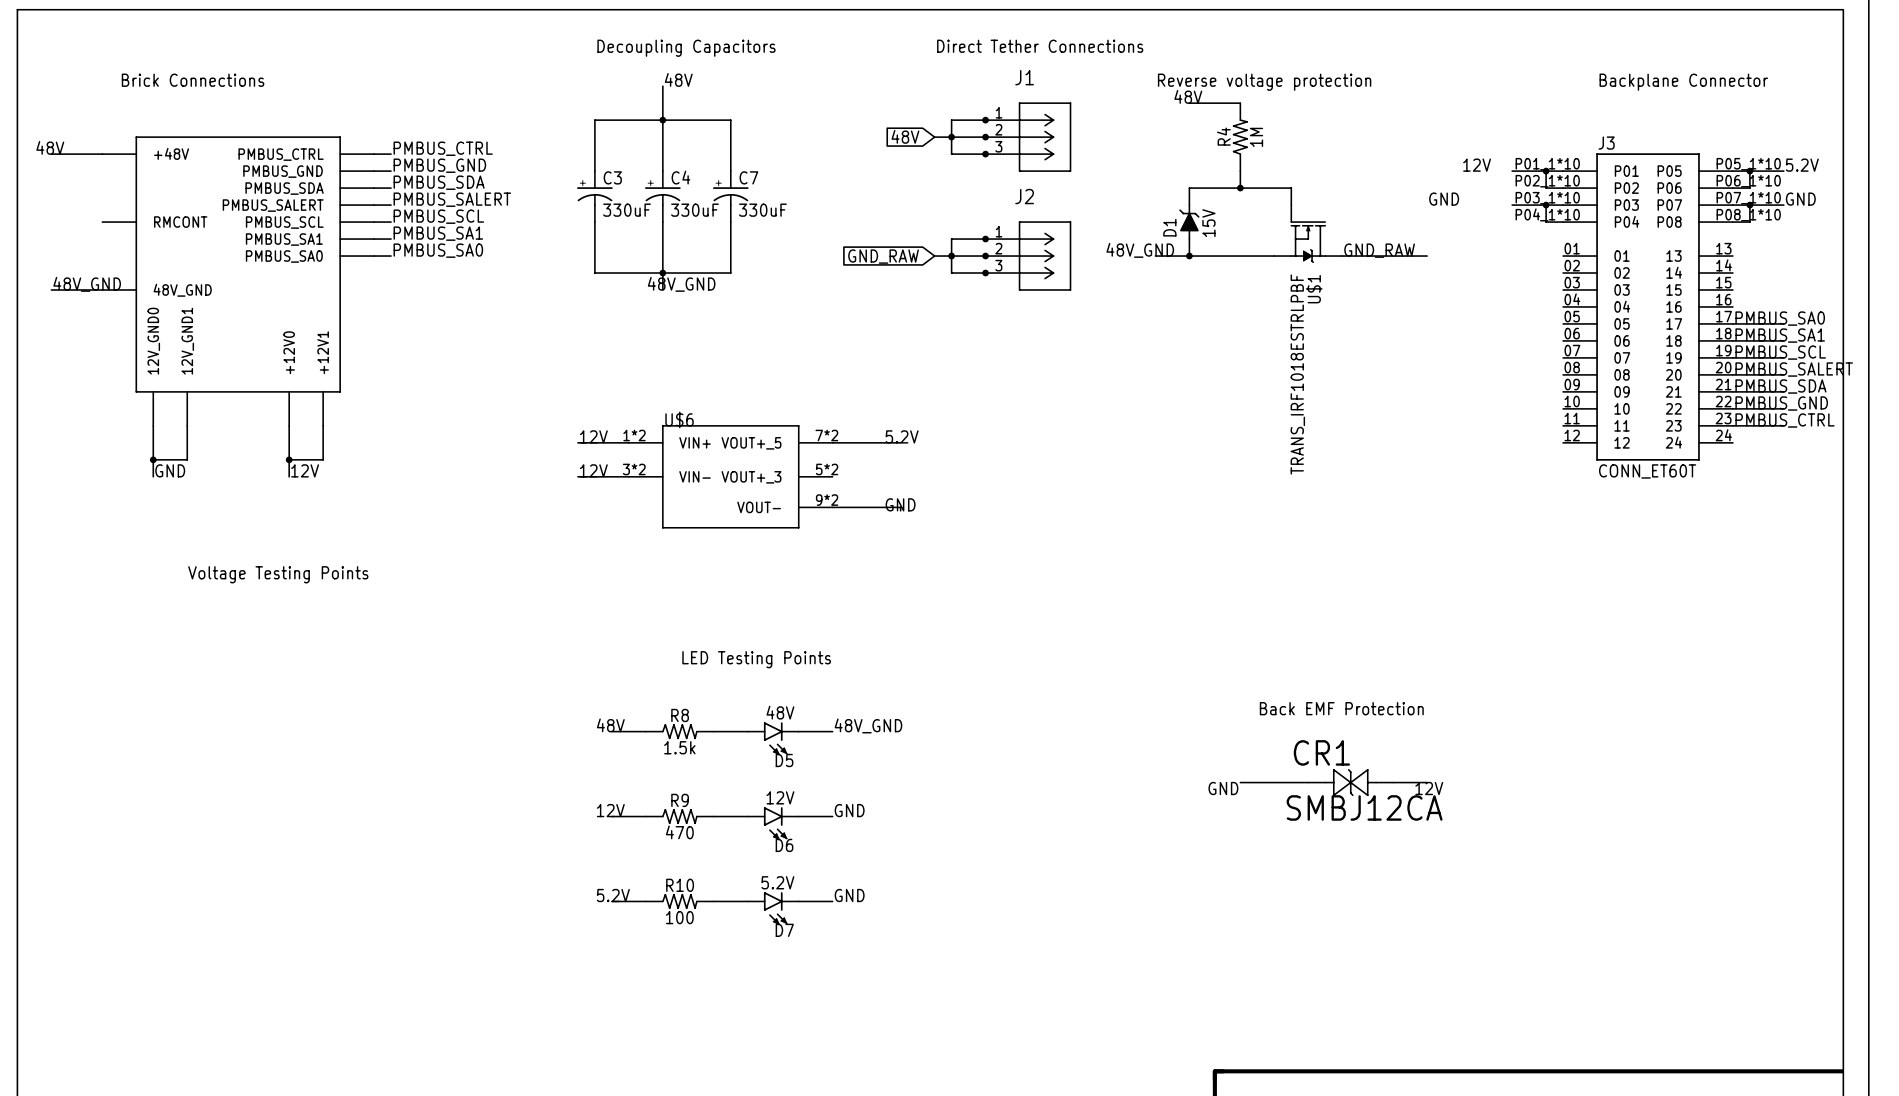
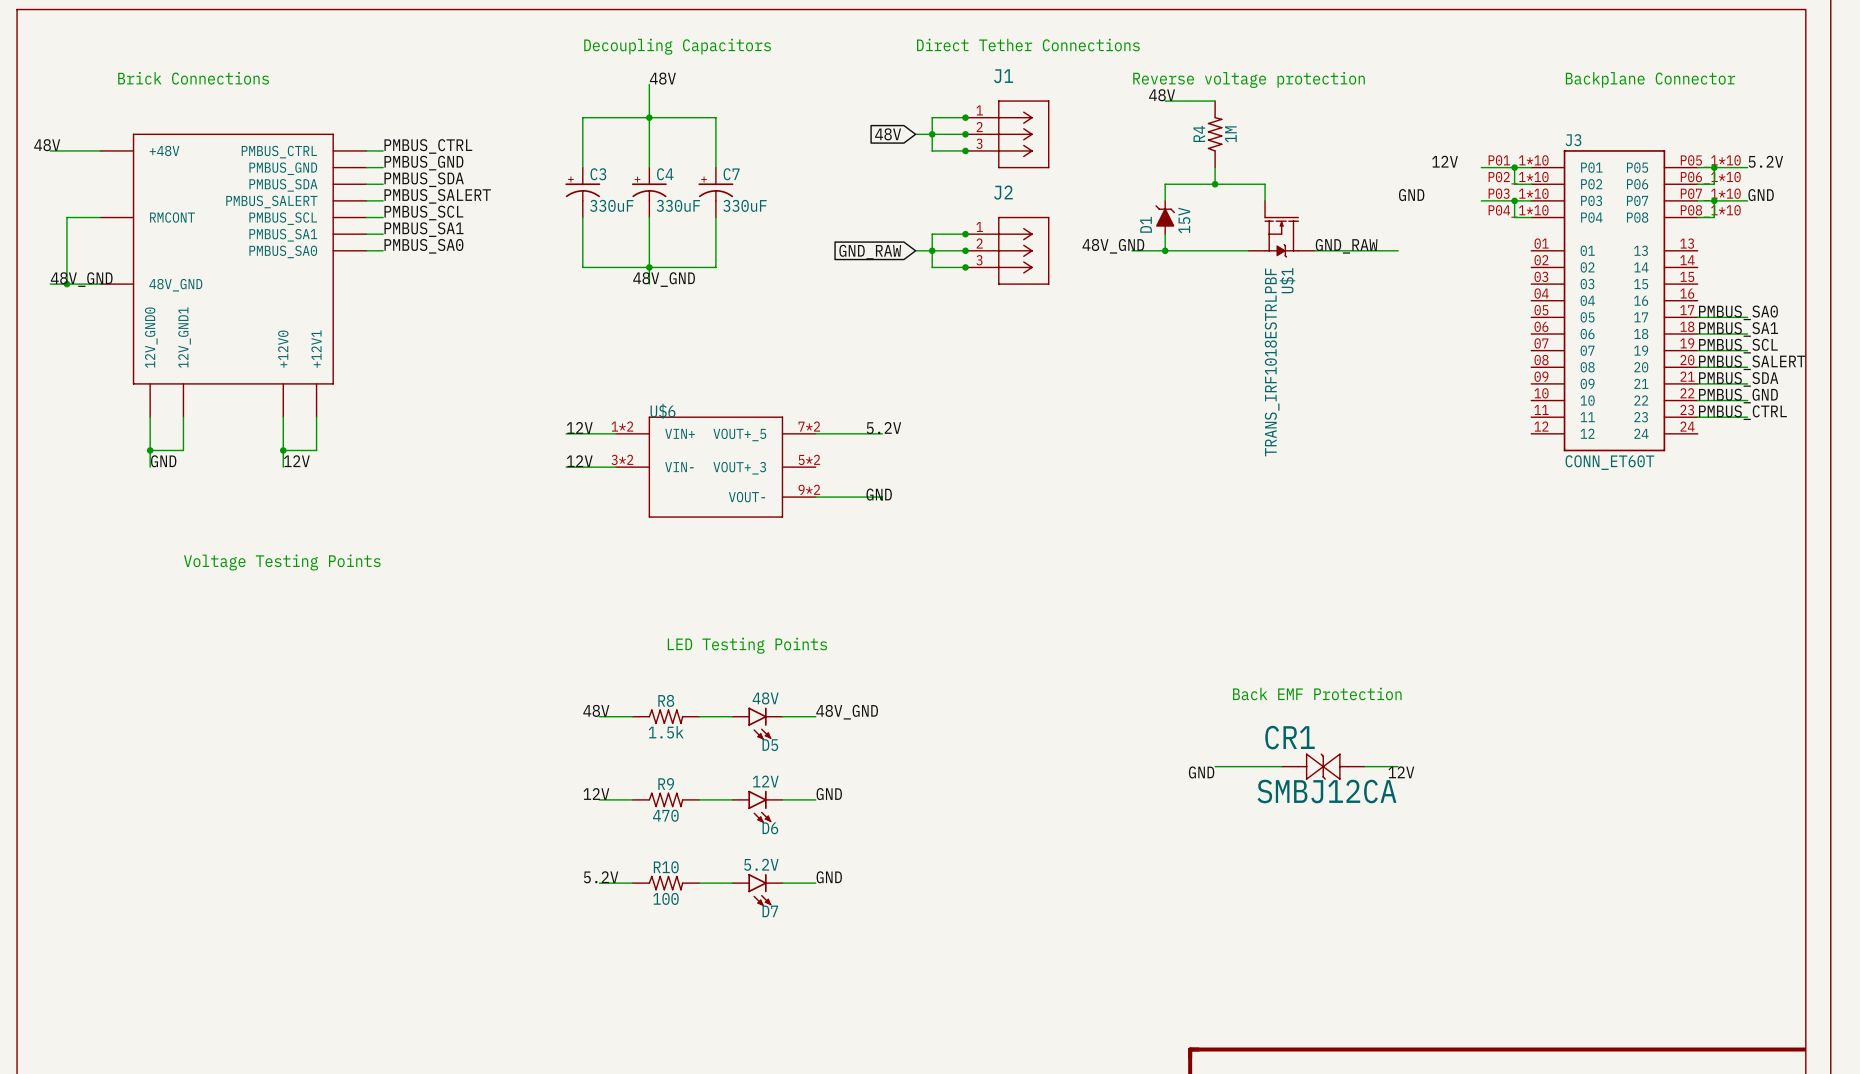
wire: none -> (100, 217) (66, 217) (66, 284)
junction: none -> (66, 284)

